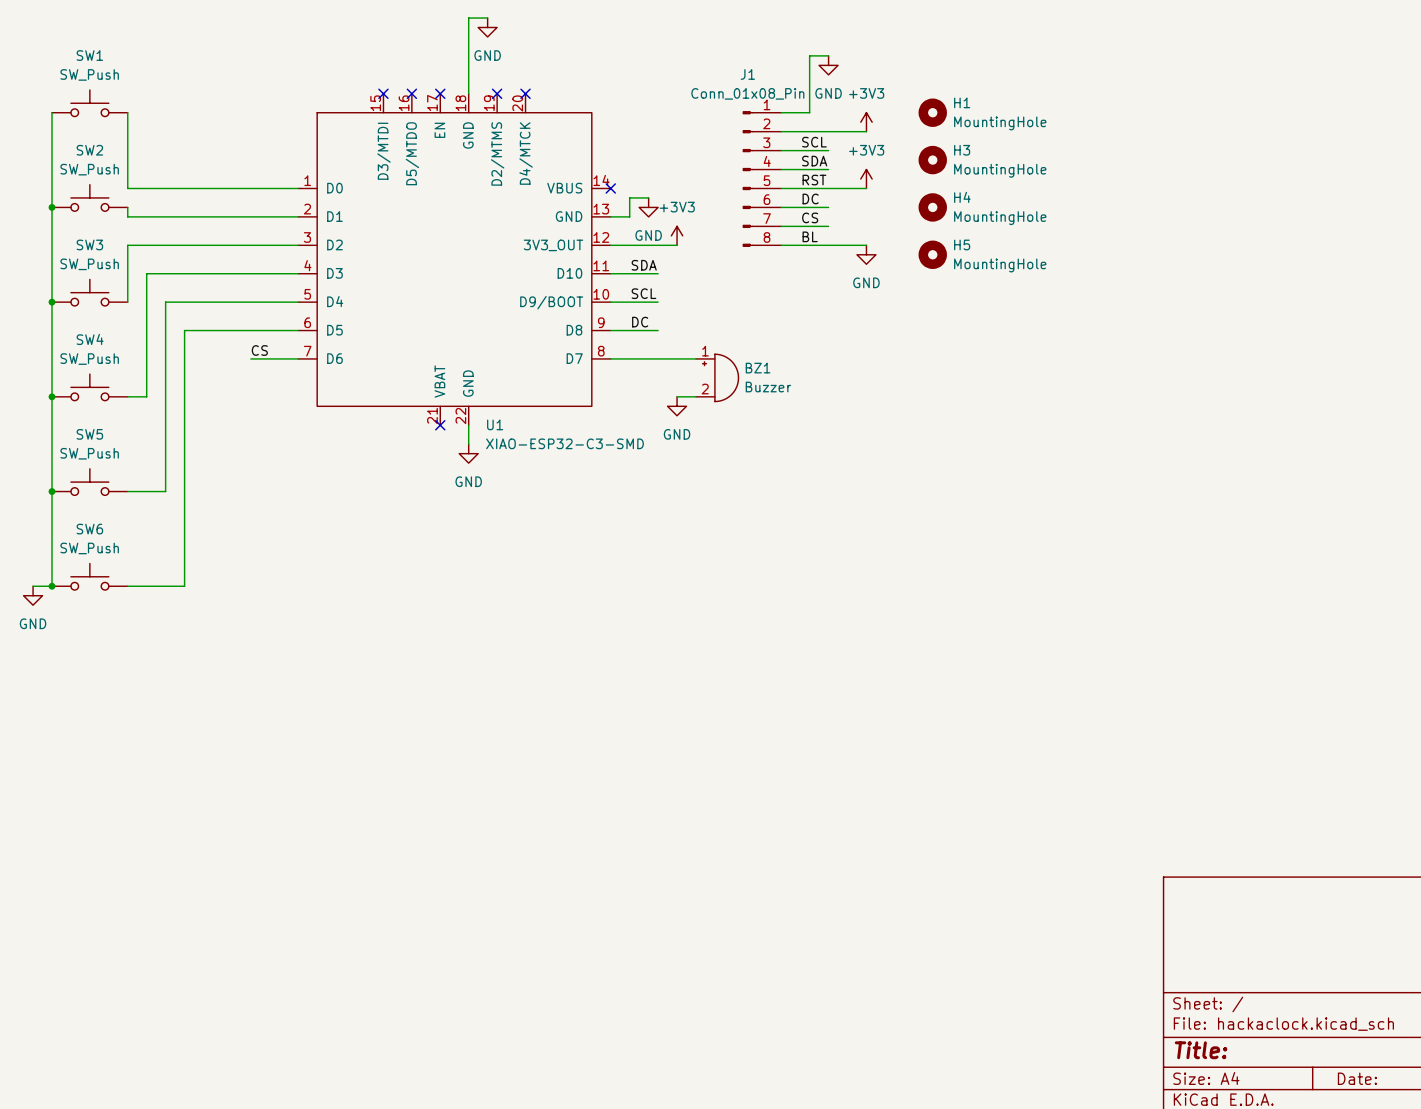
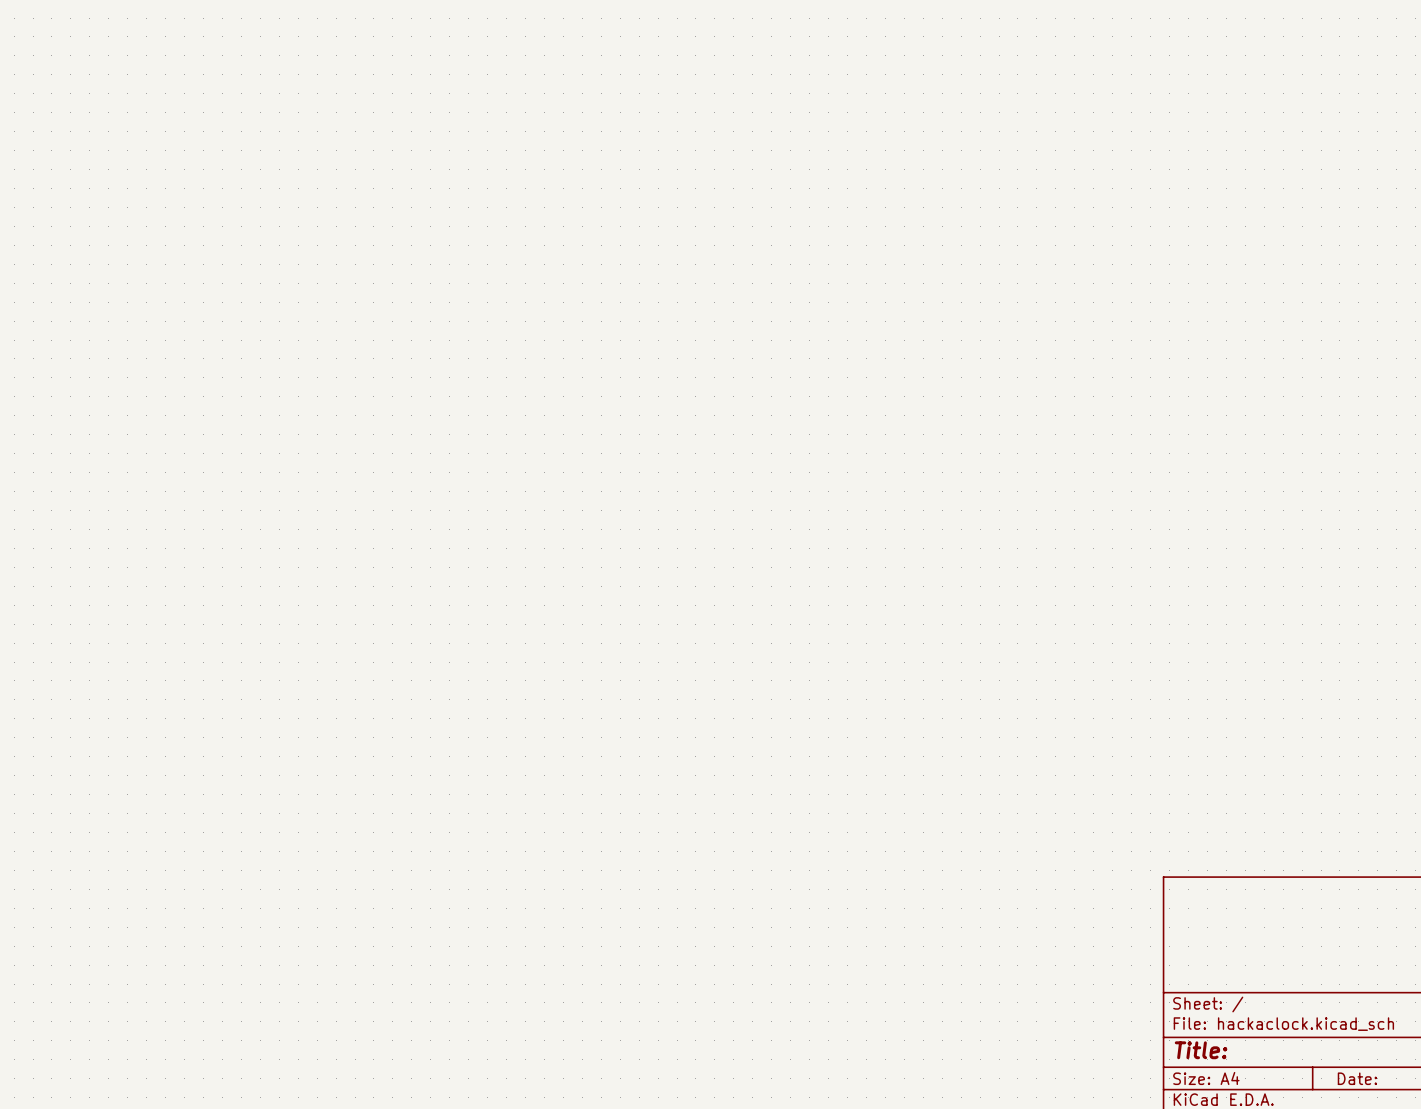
wire: (487, 18) (468, 18) (468, 93) -> none
power symbol: GND (487, 27) -> none
wire: (828, 55) (809, 55) (809, 112) (781, 112) -> none
power symbol: GND (828, 65) -> none
no-connect mark: (383, 93) -> none
no-connect mark: (411, 93) -> none
no-connect mark: (440, 93) -> none
no-connect mark: (497, 93) -> none
no-connect mark: (525, 93) -> none
SW1: SW_Push (89, 103) -> none
wire: (51, 112) (51, 586) (33, 586) -> none
wire: (127, 112) (127, 188) (298, 188) -> none
H1: MountingHole (932, 112) -> none
power symbol: +3V3 (866, 122) -> none
wire: (781, 131) (866, 131) -> none
label: SCL (814, 142) -> none
wire: (781, 150) (828, 150) -> none
H3: MountingHole (932, 160) -> none
label: SDA (814, 161) -> none
wire: (781, 169) (828, 169) -> none
J1: Conn_01x08_Pin (762, 179) -> none
power symbol: +3V3 (866, 179) -> none
label: RST (814, 180) -> none
no-connect mark: (610, 188) -> none
wire: (781, 188) (866, 188) -> none
SW2: SW_Push (89, 197) -> none
wire: (648, 197) (629, 197) (629, 216) (610, 216) -> none
label: DC (810, 198) -> none
junction: (51, 207) -> none
wire: (127, 207) (127, 216) (298, 216) -> none
power symbol: GND (648, 207) -> none
wire: (781, 207) (828, 207) -> none
H4: MountingHole (932, 207) -> none
label: CS (810, 217) -> none
wire: (781, 226) (828, 226) -> none
power symbol: +3V3 (677, 235) -> none
label: BL (810, 236) -> none
wire: (298, 245) (127, 245) (127, 302) -> none
wire: (610, 245) (677, 245) -> none
wire: (781, 245) (866, 245) -> none
power symbol: GND (866, 254) -> none
H5: MountingHole (932, 254) -> none
U1: XIAO-ESP32-C3-SMD (454, 259) -> none
label: SDA (644, 265) -> none
wire: (298, 273) (146, 273) (146, 396) (127, 396) -> none
wire: (610, 273) (658, 273) -> none
SW3: SW_Push (89, 292) -> none
label: SCL (643, 293) -> none
junction: (51, 302) -> none
wire: (298, 302) (165, 302) (165, 491) (127, 491) -> none
wire: (610, 302) (658, 302) -> none
label: DC (640, 322) -> none
wire: (298, 330) (184, 330) (184, 586) (127, 586) -> none
wire: (610, 330) (658, 330) -> none
label: CS (259, 350) -> none
wire: (250, 358) (298, 358) -> none
wire: (610, 358) (695, 358) -> none
BZ1: Buzzer (717, 377) -> none
SW4: SW_Push (89, 387) -> none
junction: (51, 396) -> none
wire: (677, 396) (695, 396) -> none
power symbol: GND (677, 406) -> none
no-connect mark: (440, 425) -> none
wire: (468, 425) (468, 444) -> none
power symbol: GND (468, 453) -> none
SW5: SW_Push (89, 482) -> none
junction: (51, 491) -> none
SW6: SW_Push (89, 576) -> none
junction: (51, 586) -> none
power symbol: GND (33, 595) -> none

